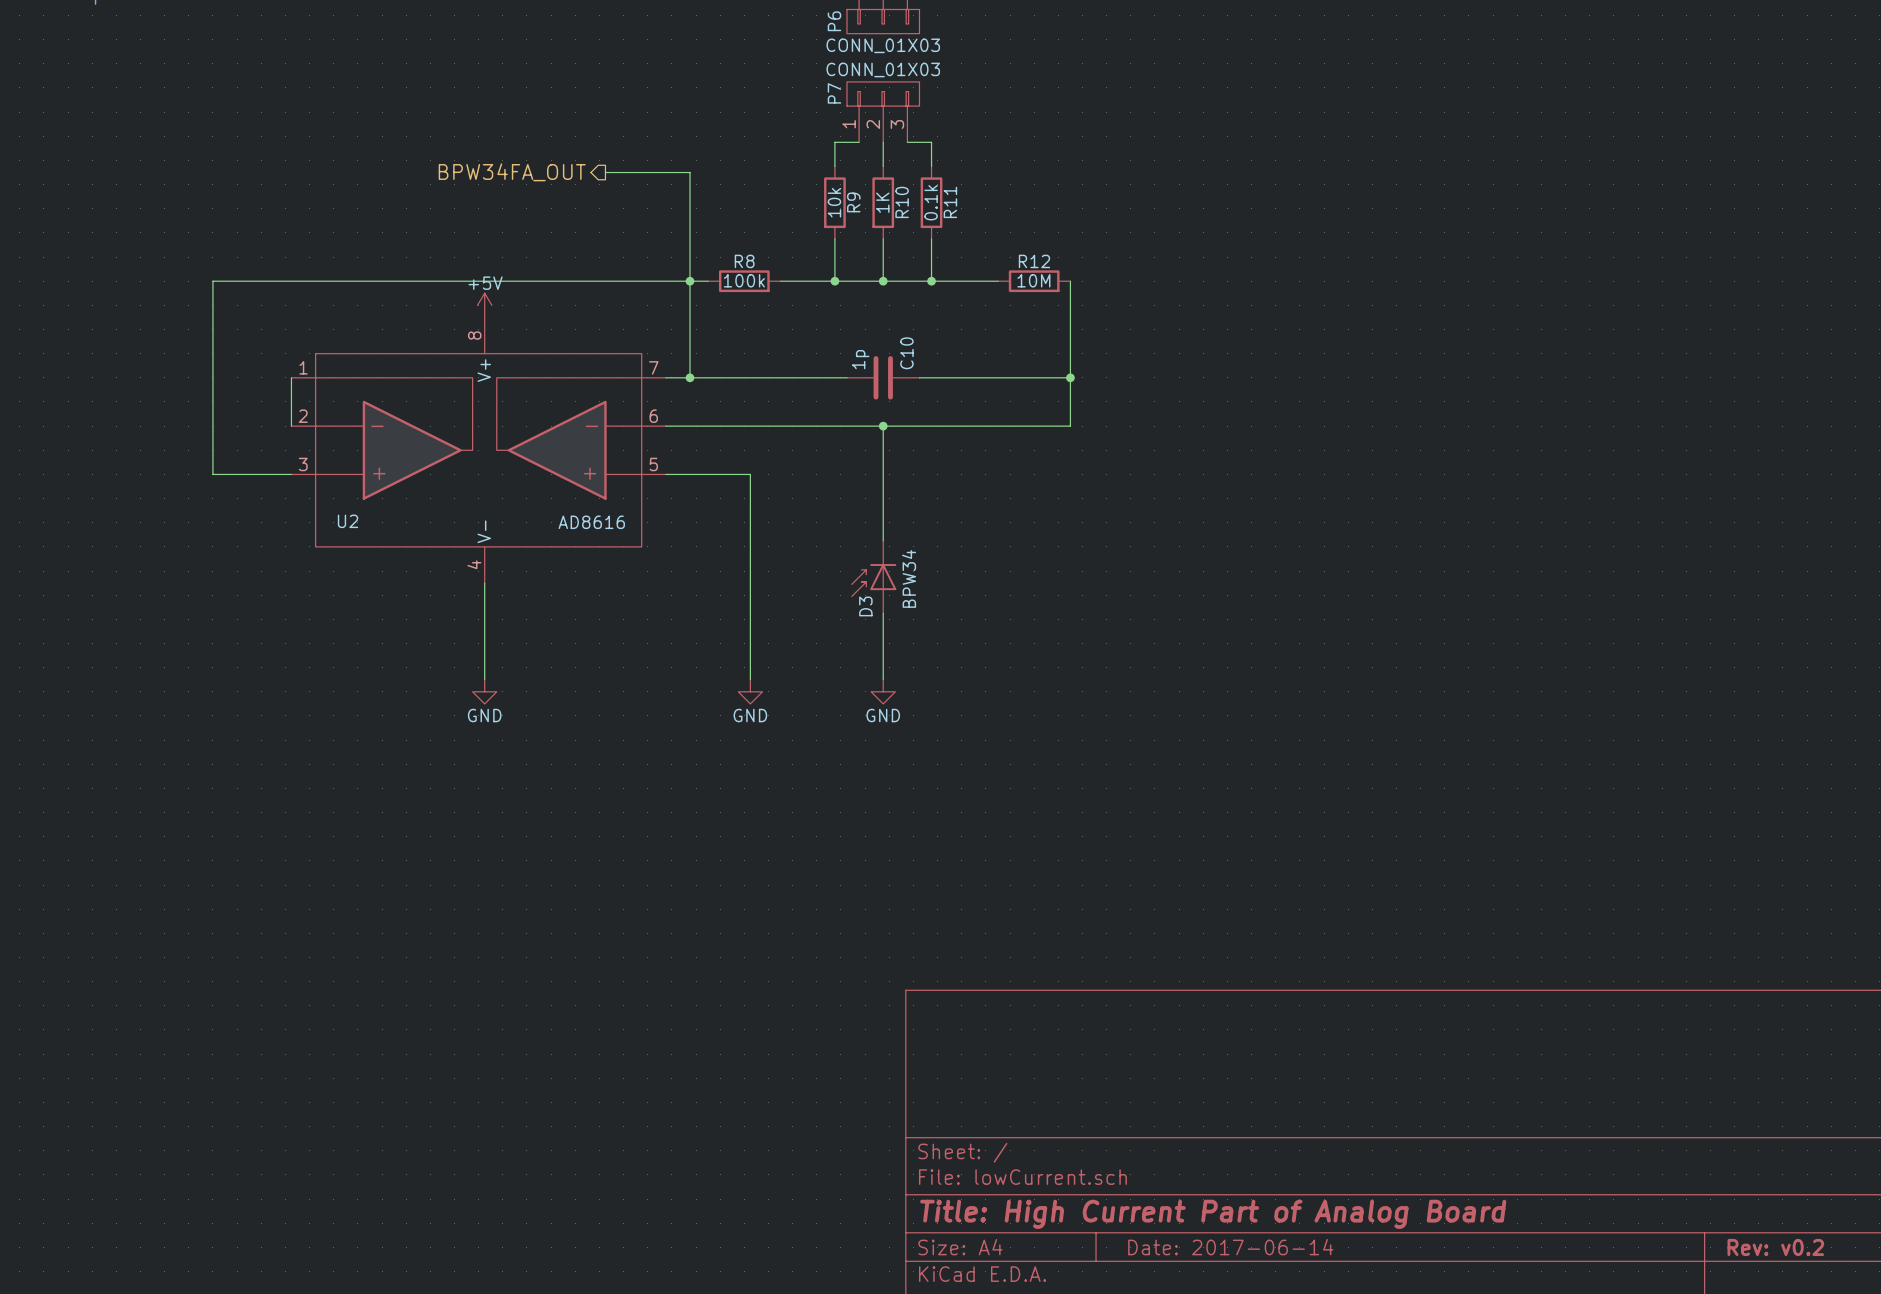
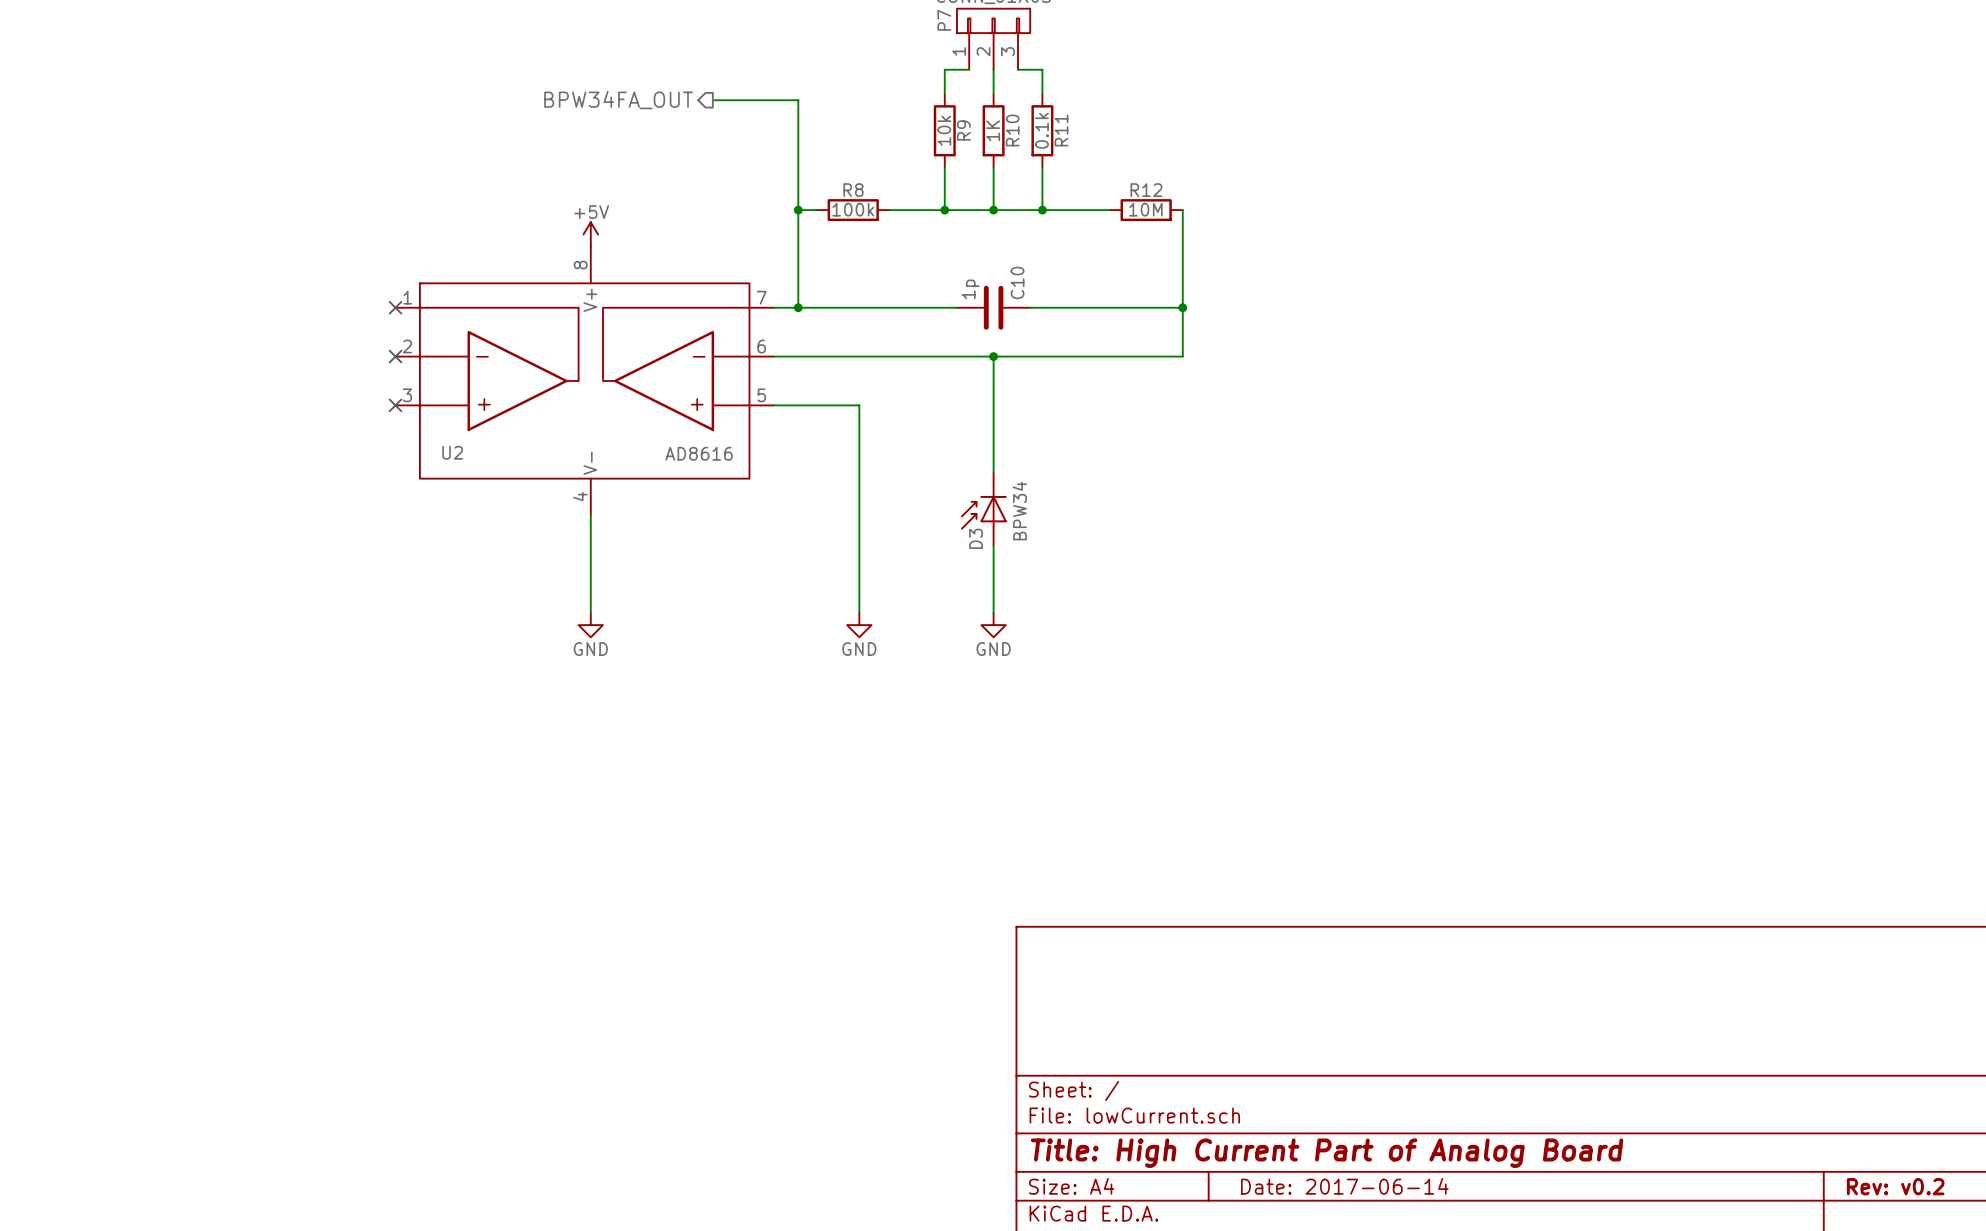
wire: (690, 281) (212, 281) (212, 474) (291, 474) -> none
wire: (291, 377) (291, 426) -> none
no-connect mark: none -> (395, 307)
no-connect mark: none -> (395, 356)
no-connect mark: none -> (395, 405)

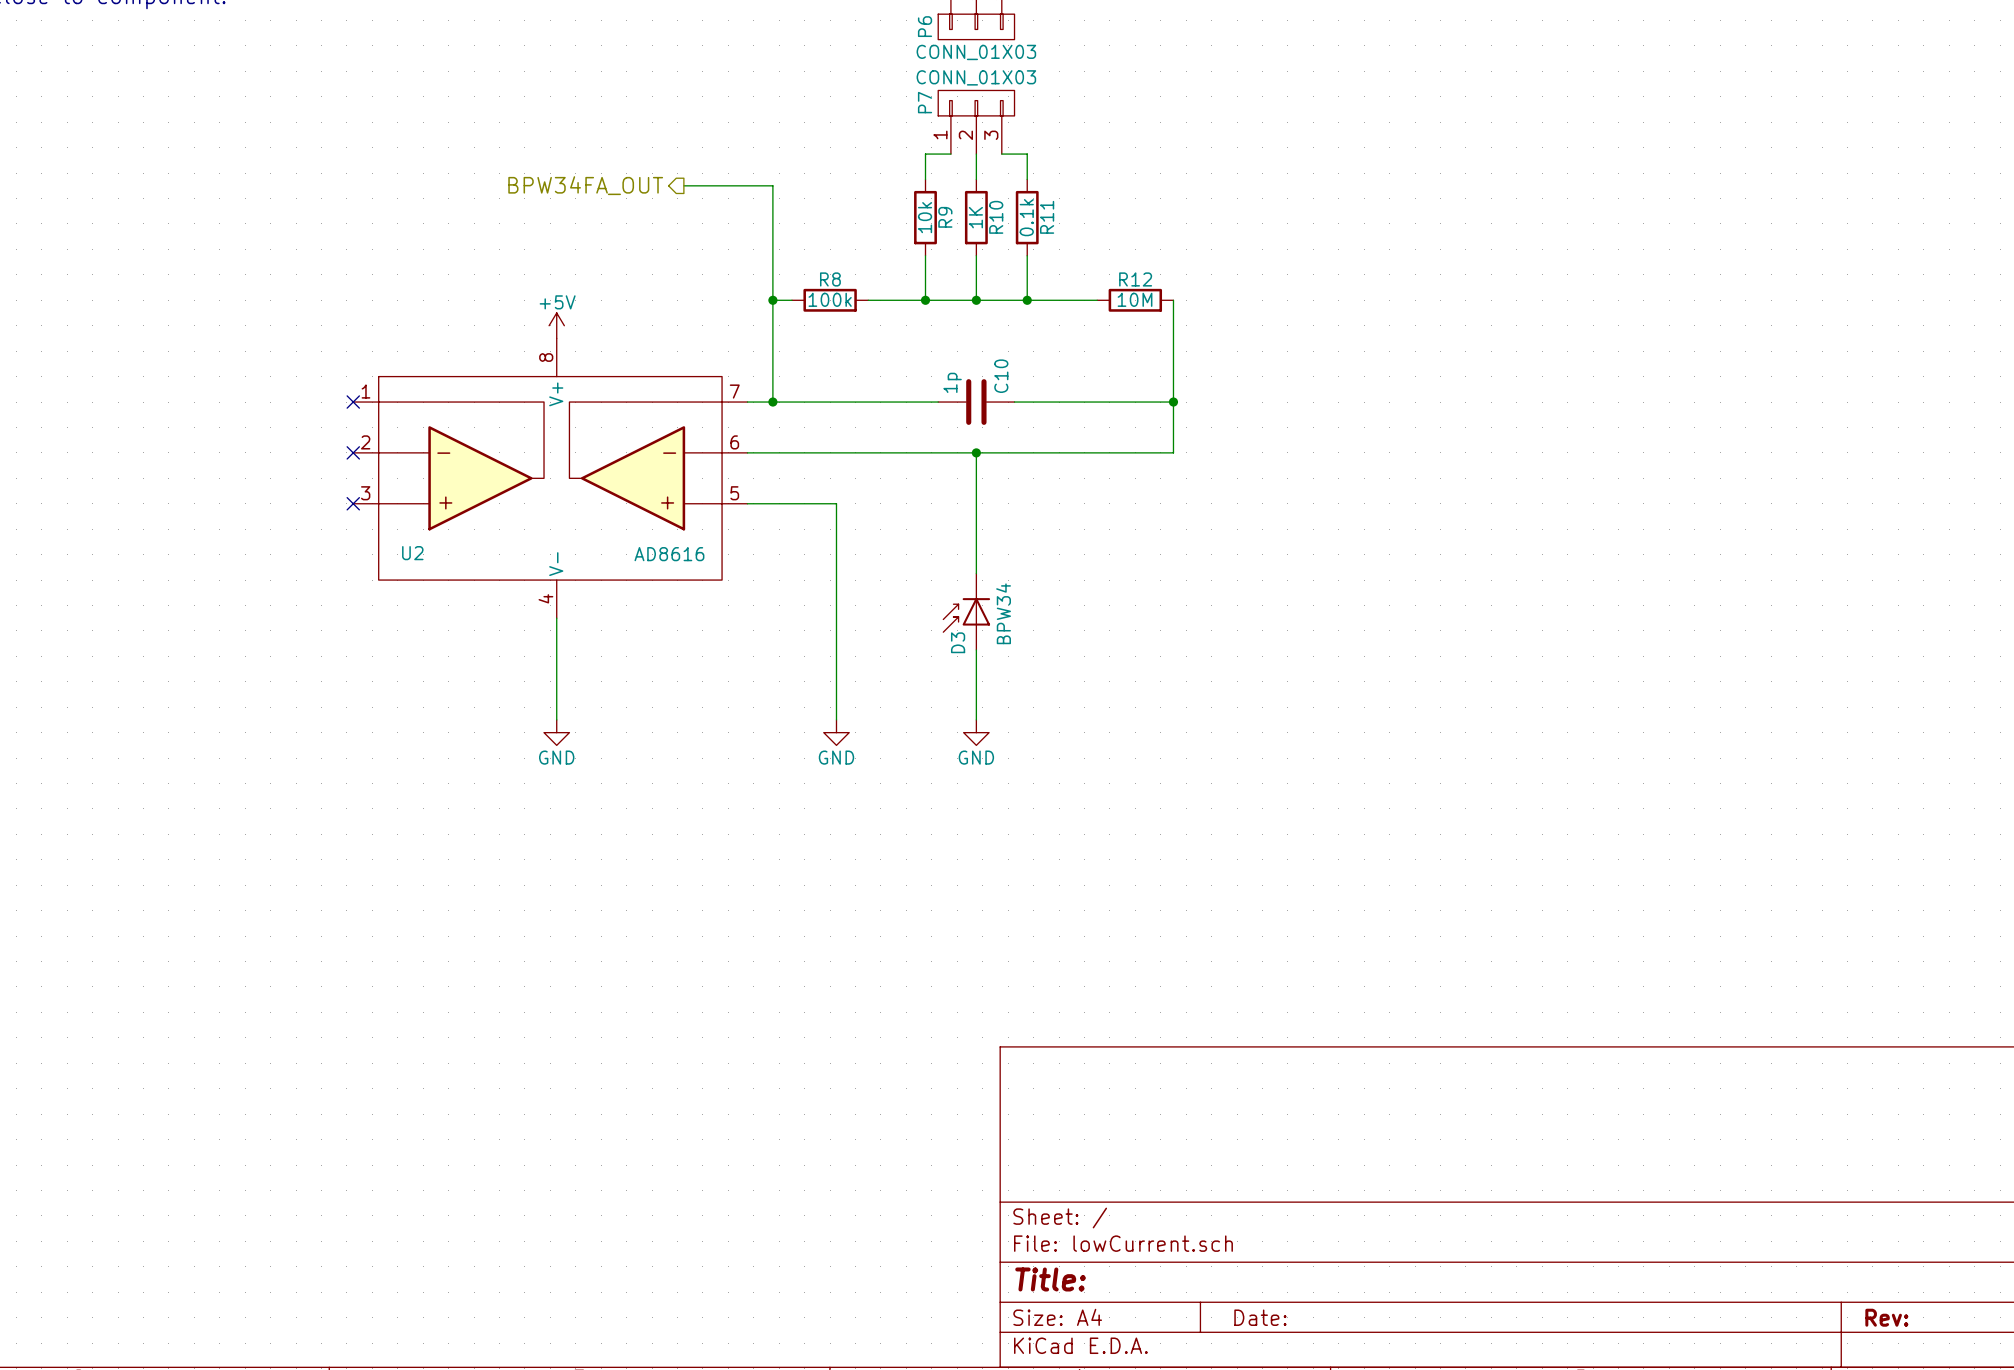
title block: Title: High Current Part of Analog Board (1327, 1153) -> Title: (1050, 1279)
title block: Date: 2017-06-14 (1344, 1186) -> Date: (1260, 1317)
title block: Rev: v0.2 (1895, 1186) -> Rev: (1886, 1317)

